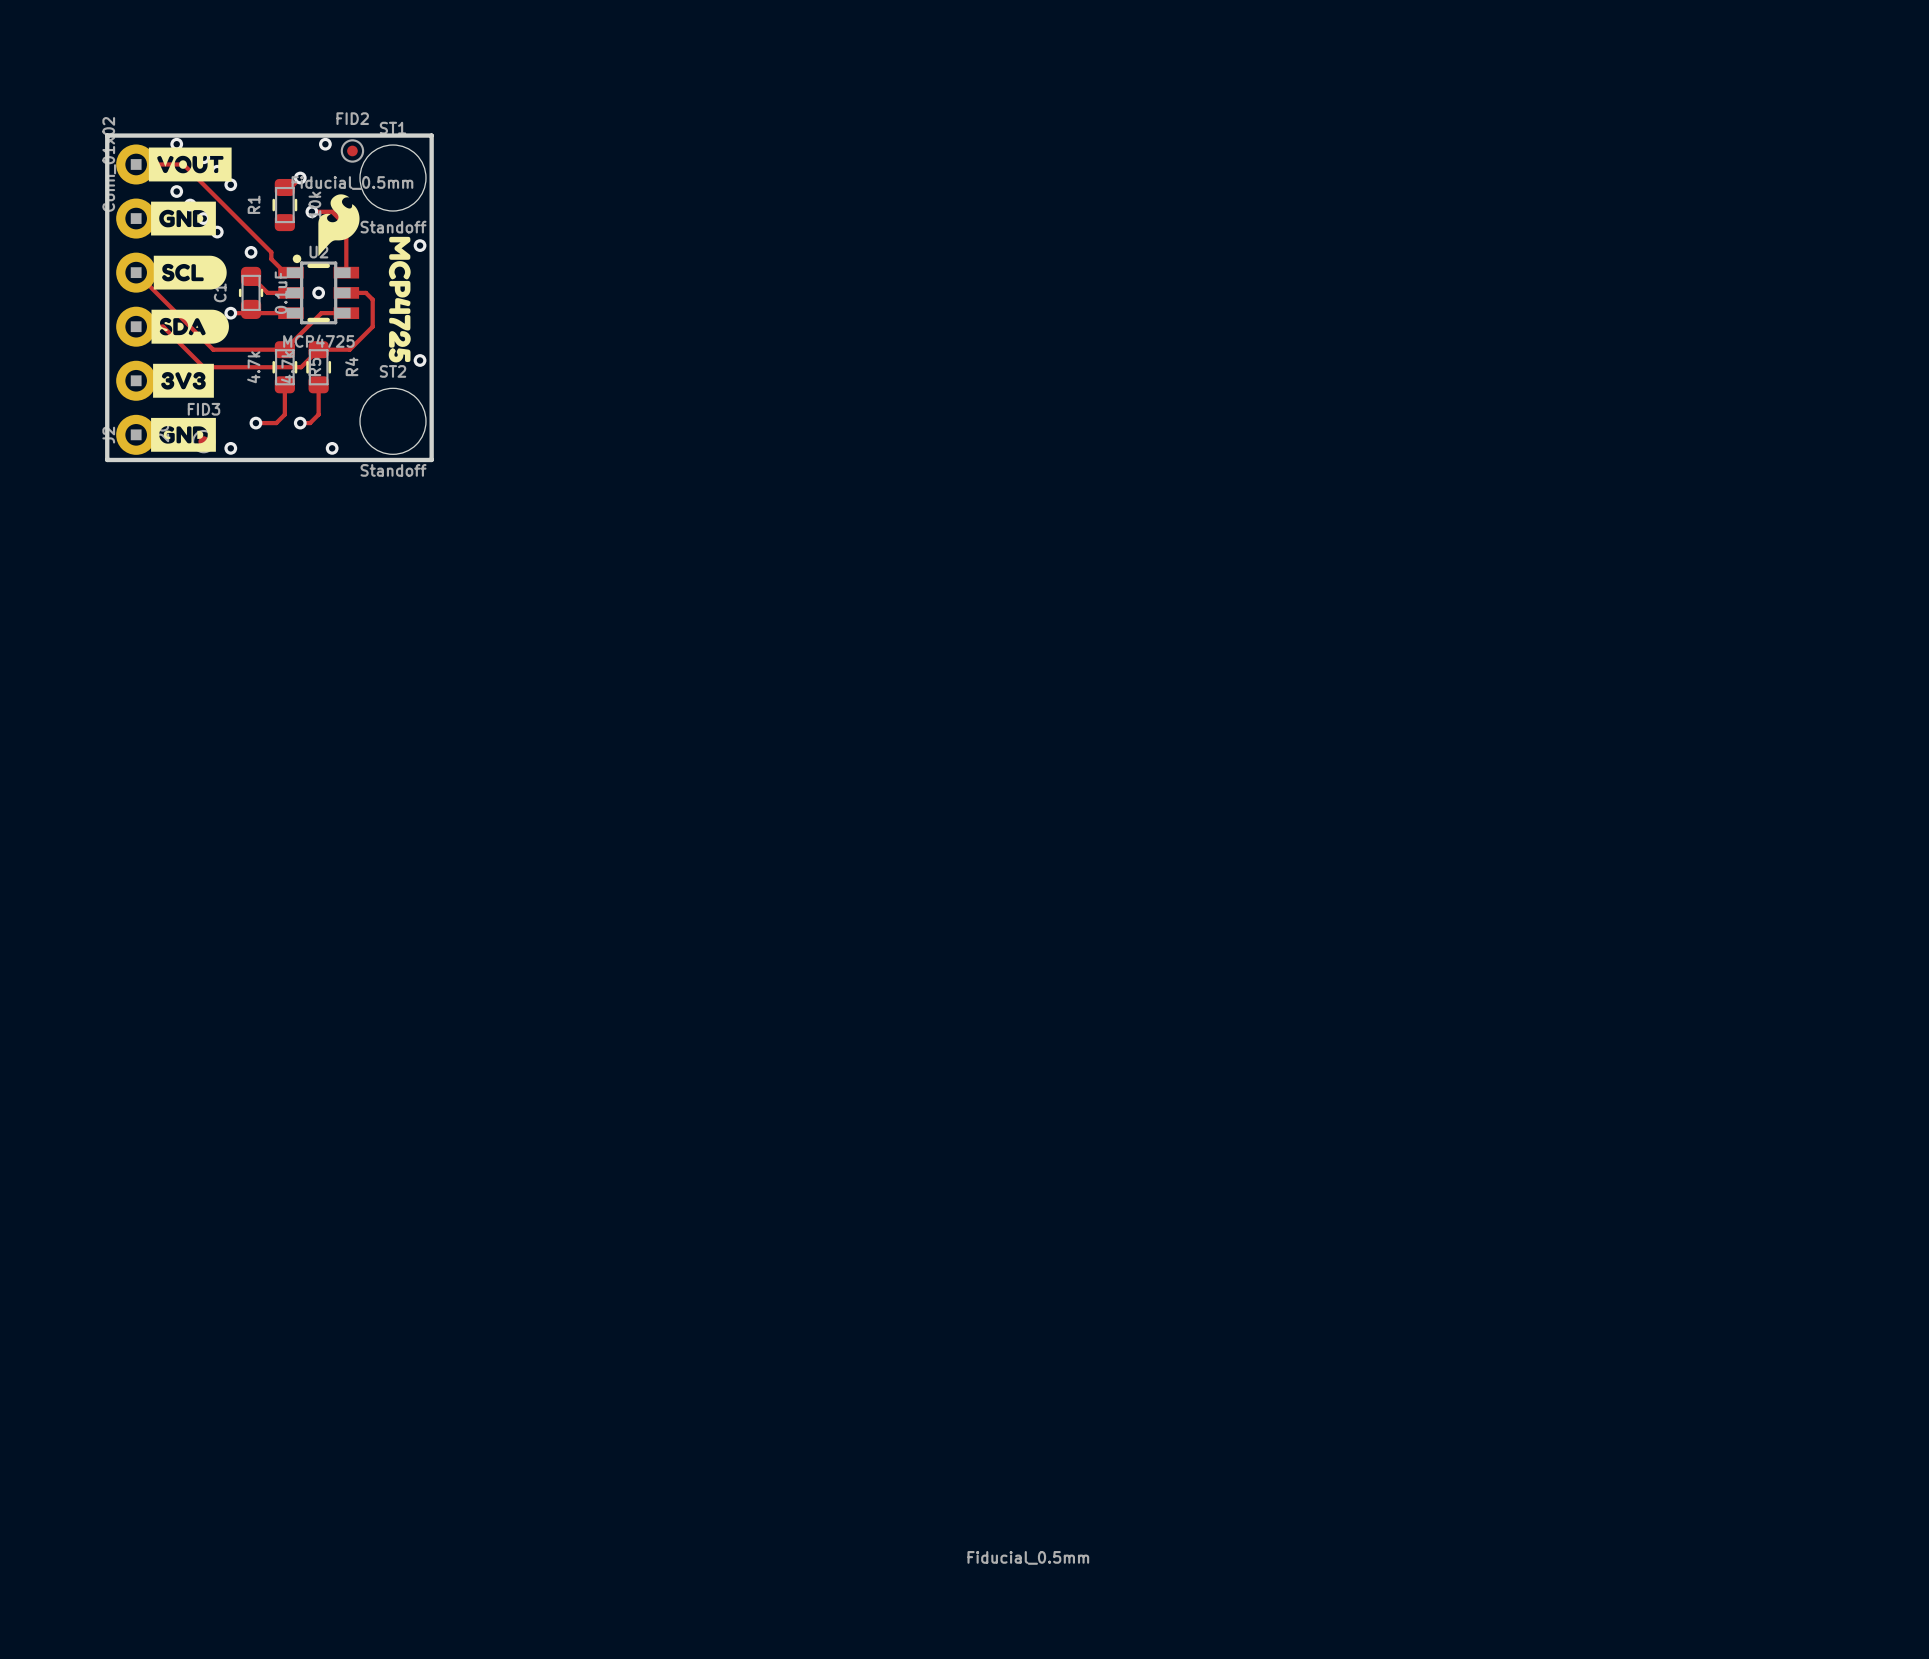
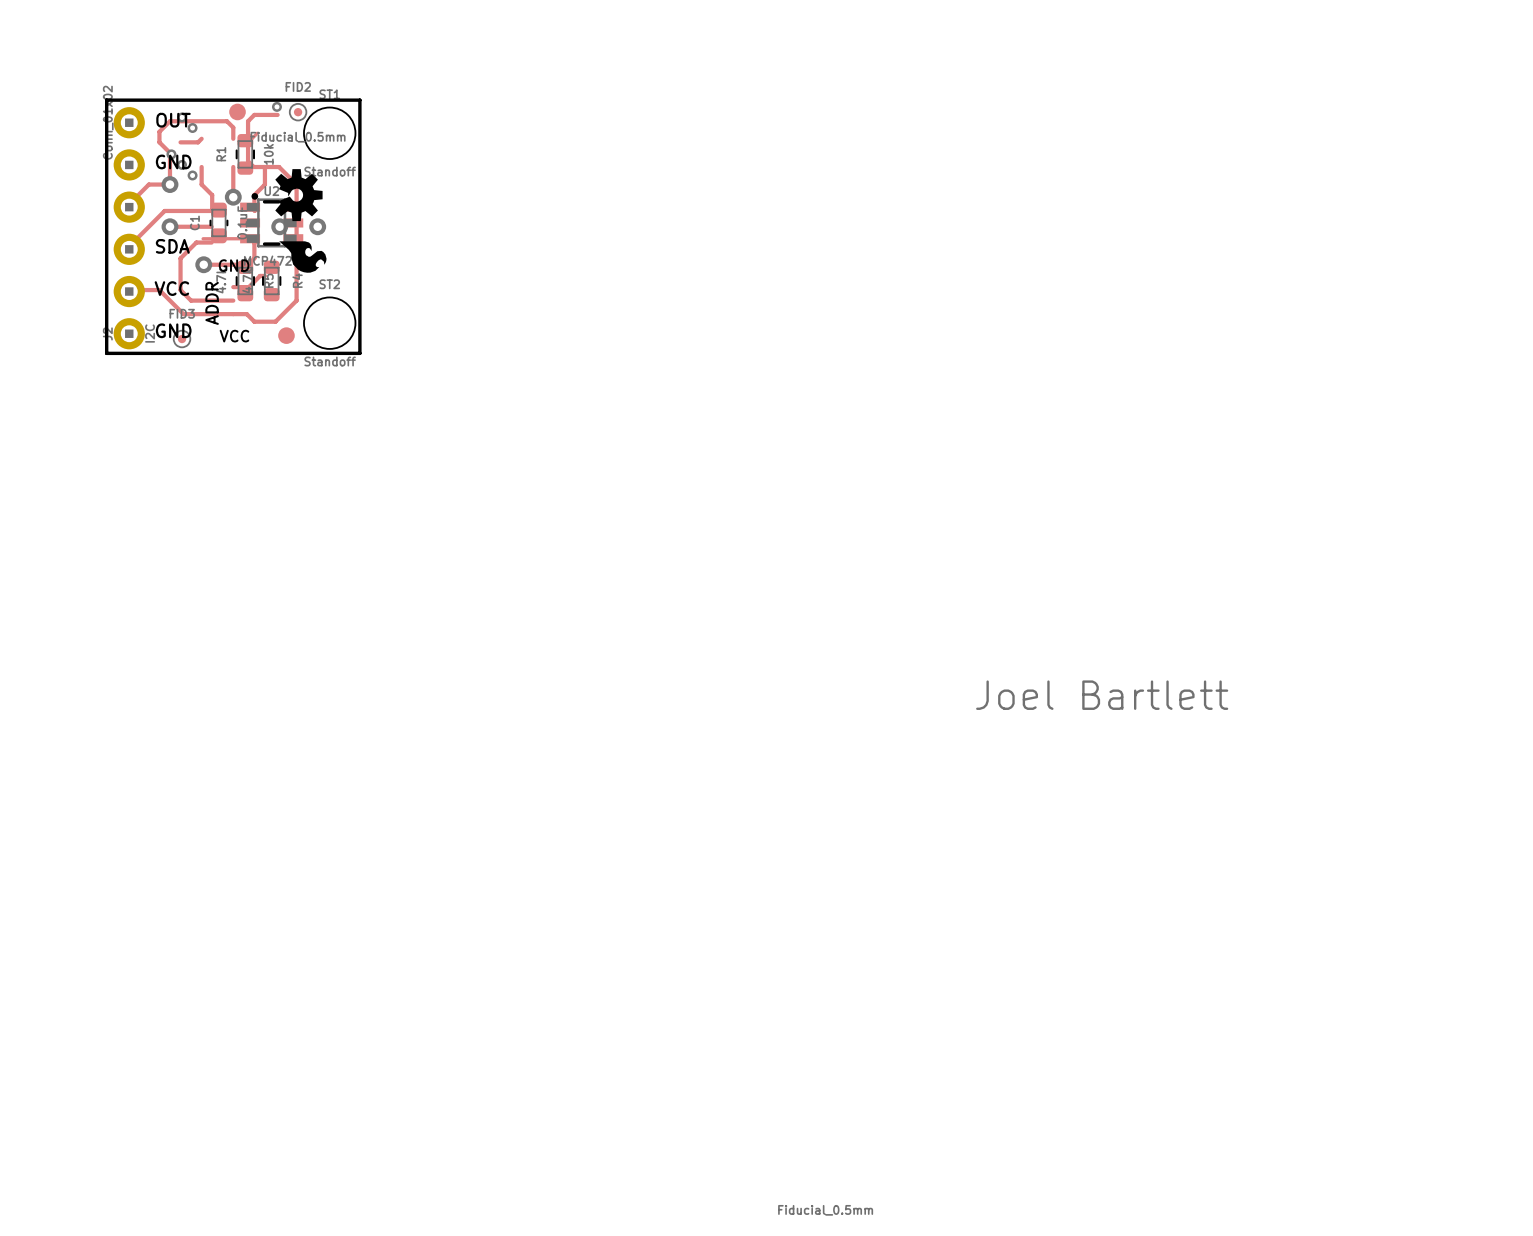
via: (176, 144) -> none
drawing: [148, 147, 232, 452] -> none
part: none -> (237, 111)
track: none -> (277, 114) (254, 114) (248, 121) (248, 161) (253, 167) (279, 167) (296, 184) (296, 300) (275, 321) (254, 321) (246, 314) (183, 314) (159, 290) (127, 290)
text: none -> OUT (173, 120)
track: (136, 164) (183, 164) (271, 252) (271, 259) (284, 272) (290, 272) -> none
via: (300, 178) -> none
via: (230, 184) -> none
track: none -> (201, 138) (198, 142) (180, 142)
track: none -> (233, 138) (233, 127) (226, 121) (169, 121) (159, 131) (159, 142) (169, 152) (169, 184) (148, 184) (127, 205)
via: (176, 191) -> none
drawing: [318, 194, 360, 257] -> none
track: (311, 211) (332, 211) (346, 225) (346, 272) -> none
via: (311, 211) -> none
text: none -> GND (173, 161)
track: none -> (201, 167) (201, 184) (212, 195) (212, 210) (164, 210) (127, 247)
track: none -> (233, 167) (233, 197)
track: none -> (264, 167) (264, 184) (254, 195) (254, 210)
drawing: none -> [275, 169, 323, 222]
drawing: [388, 236, 411, 363] -> none
via: none -> (169, 184)
via: (420, 245) -> none
via: (251, 252) -> none
via: none -> (233, 197)
track: (136, 272) (213, 349) (284, 349) (321, 313) (346, 313) -> none
track: (251, 276) (267, 292) (290, 292) -> none
via size: [312, 286, 326, 300] -> [271, 218, 289, 236]
track: (346, 292) (365, 292) (372, 299) (372, 326) (349, 349) (318, 349) (301, 367) (203, 367) (163, 326) (136, 326) -> none
track: none -> (169, 226) (211, 226)
via: none -> (169, 226)
via: none -> (317, 226)
via: (230, 313) -> none
drawing: none -> [279, 241, 327, 273]
track: none -> (211, 242) (196, 242) (180, 258) (180, 290) (191, 300) (233, 300)
track: none -> (254, 242) (254, 258) (248, 264) (203, 264)
text: none -> SDA (172, 246)
via: none -> (203, 264)
text: none -> GND (234, 265)
track: none -> (264, 275) (260, 275) (248, 287) (233, 287)
via: (420, 360) -> none
text: none -> VCC (171, 288)
track: (284, 384) (284, 414) (276, 423) (255, 423) -> none
track: (318, 384) (318, 414) (310, 423) (300, 423) -> none
text: none -> ADDR (212, 303)
via: (255, 423) -> none
via: (300, 423) -> none
text: none -> GND (173, 330)
text: none -> VCC (234, 336)
part: none -> (286, 335)
via: (230, 448) -> none
via: (332, 448) -> none
text: none -> Joel Bartlett (1102, 695)

